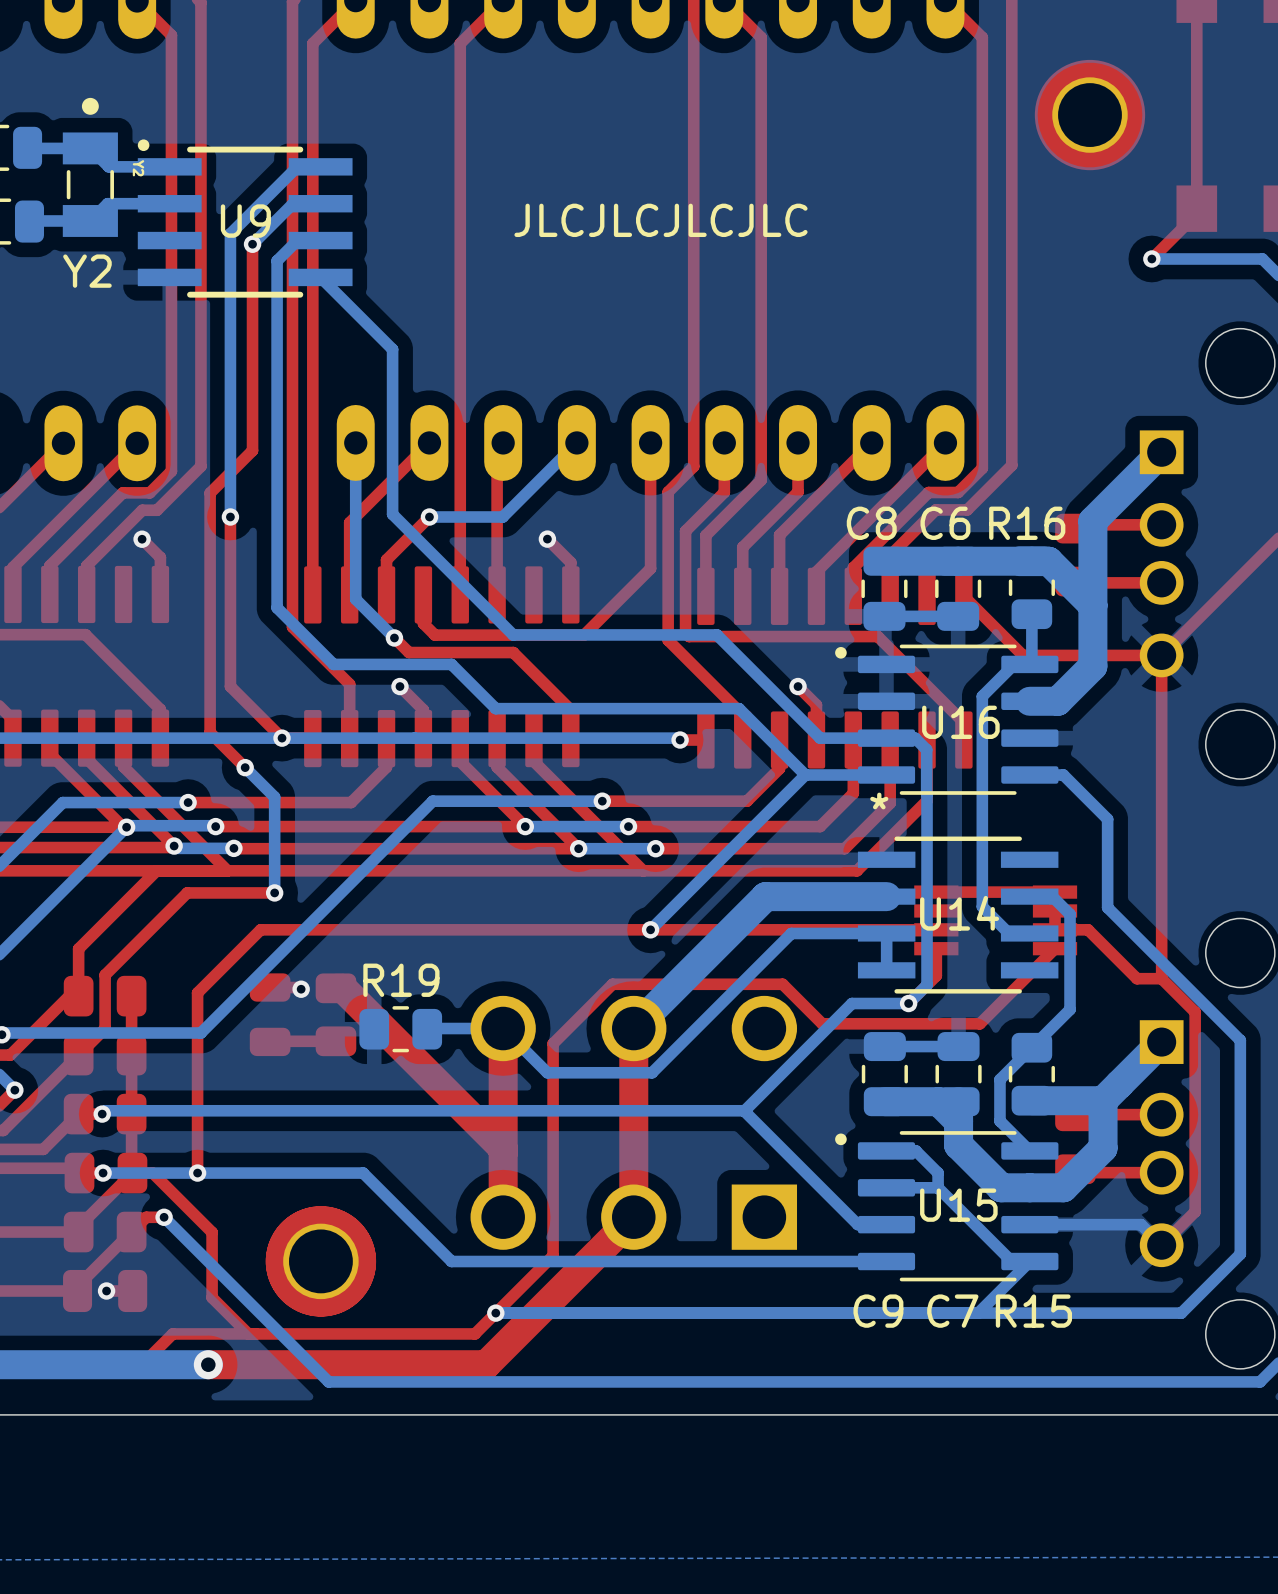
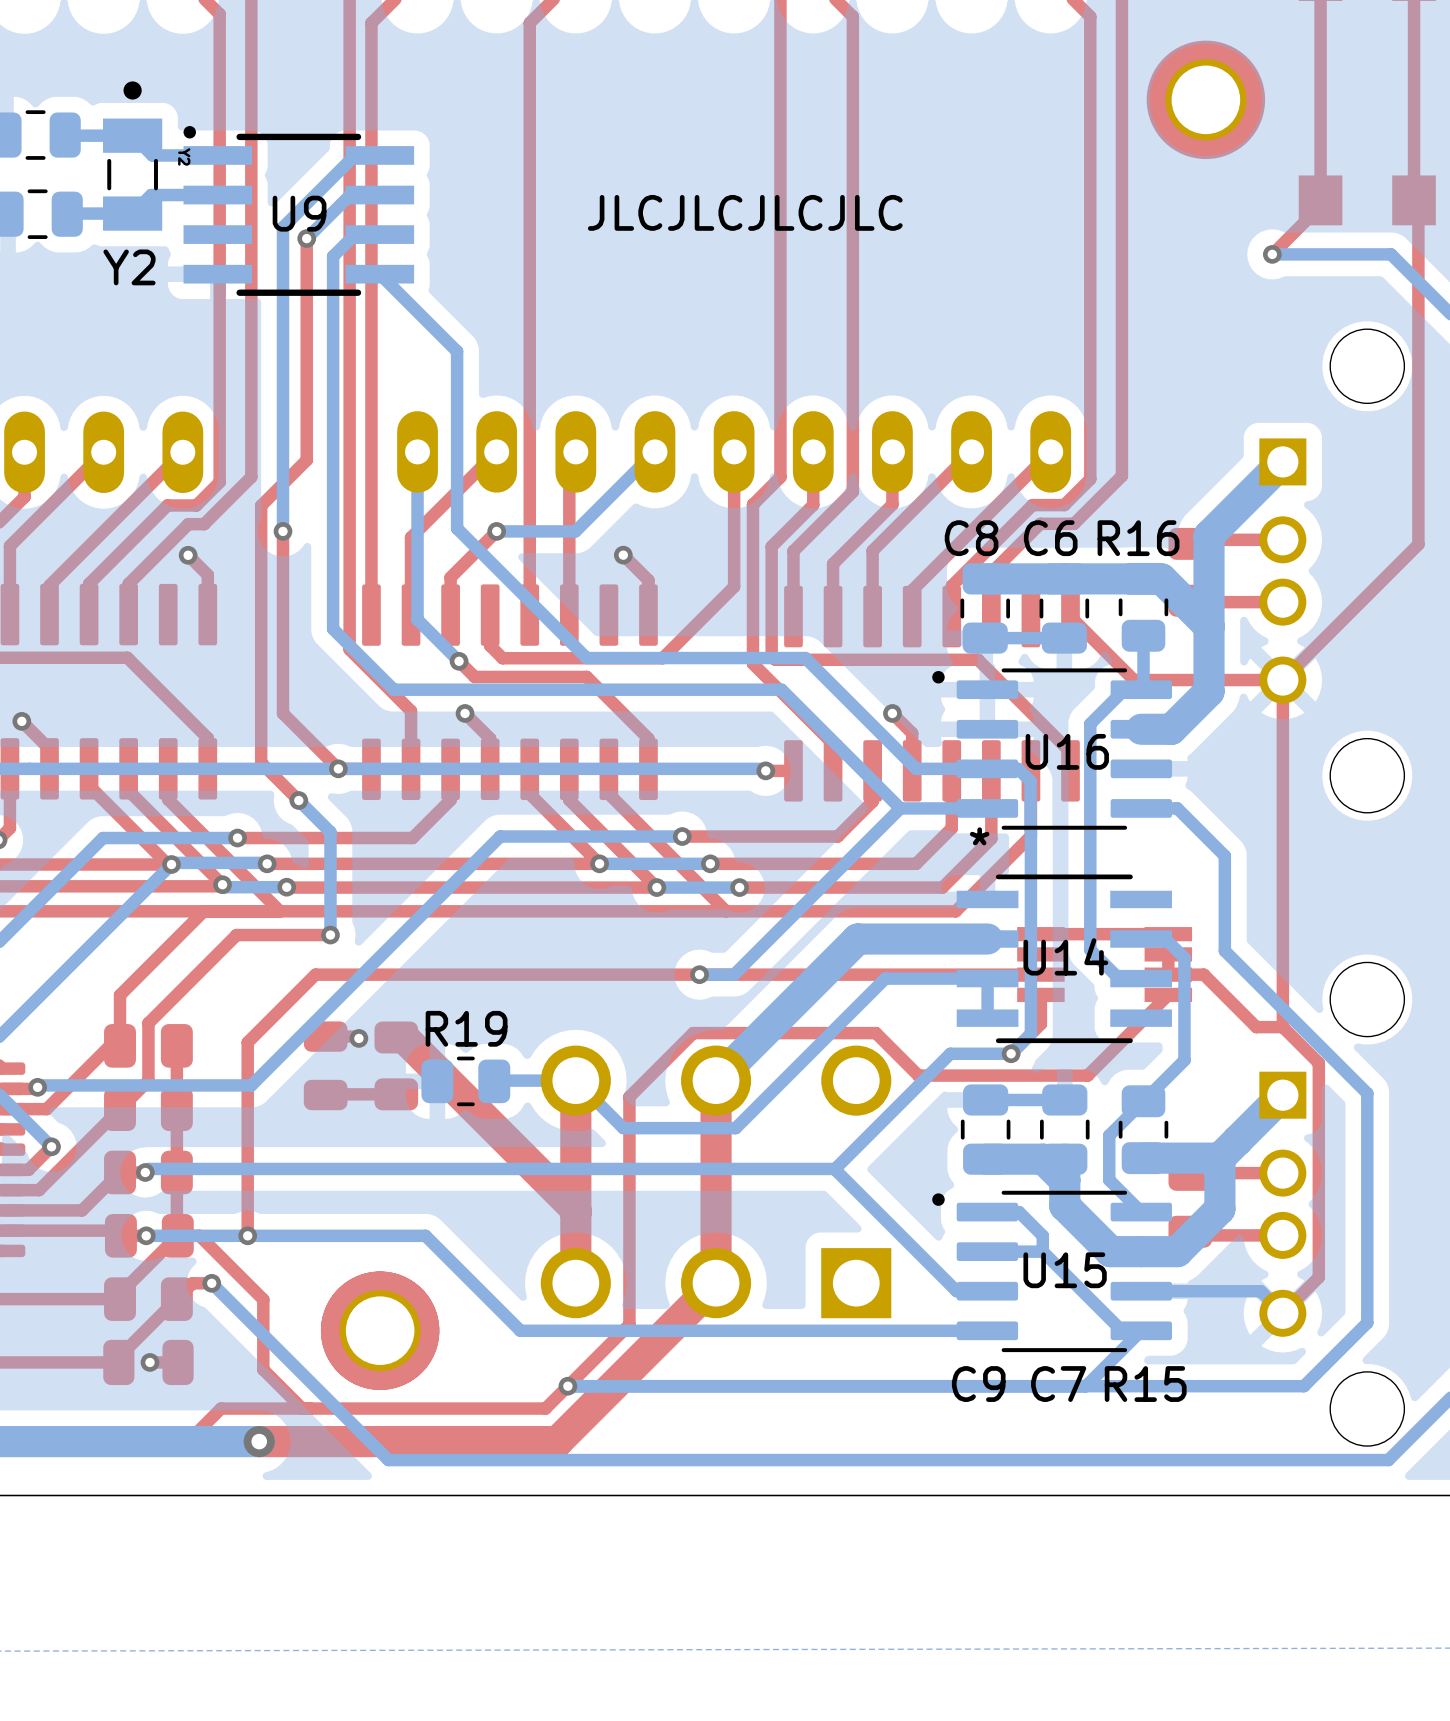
bottom track: (451, 664) (495, 708) (739, 708) -> (520, 689) (781, 689) (829, 737)
bottom track: none -> (734, 974) (699, 974)
via position: (650, 929) -> (699, 974)

